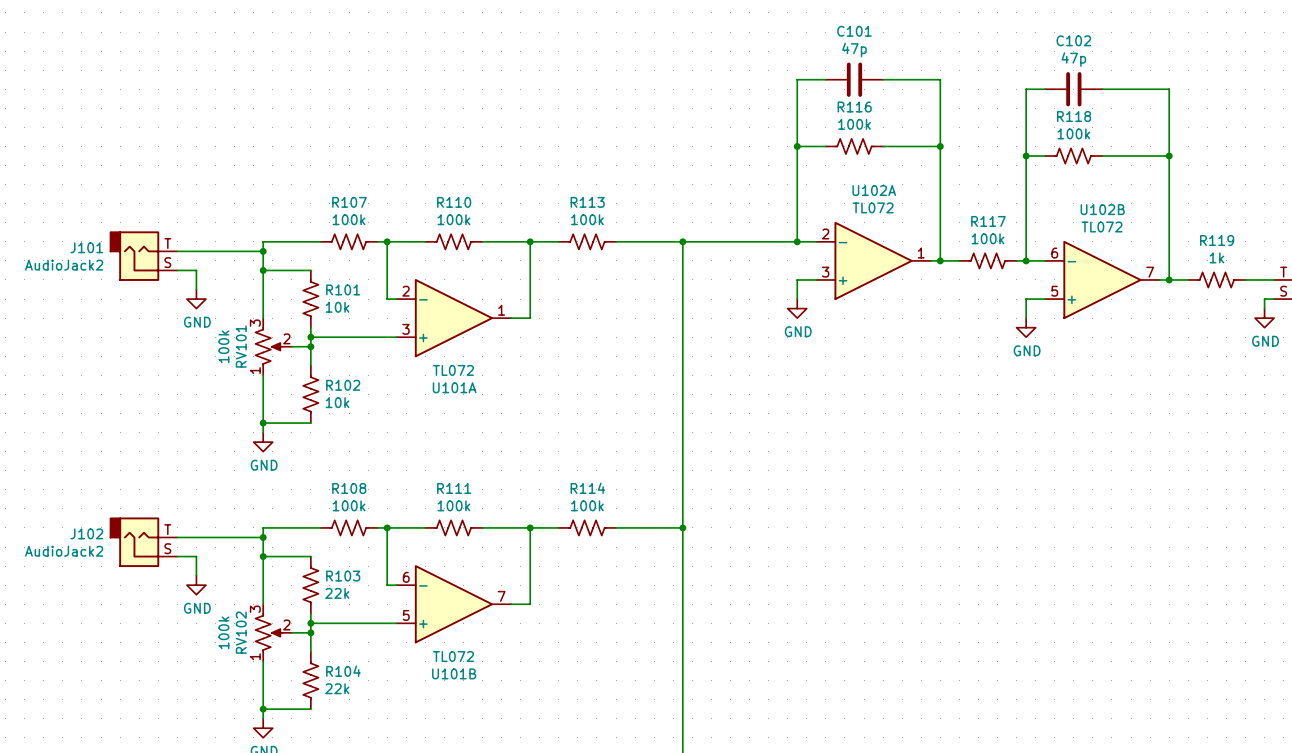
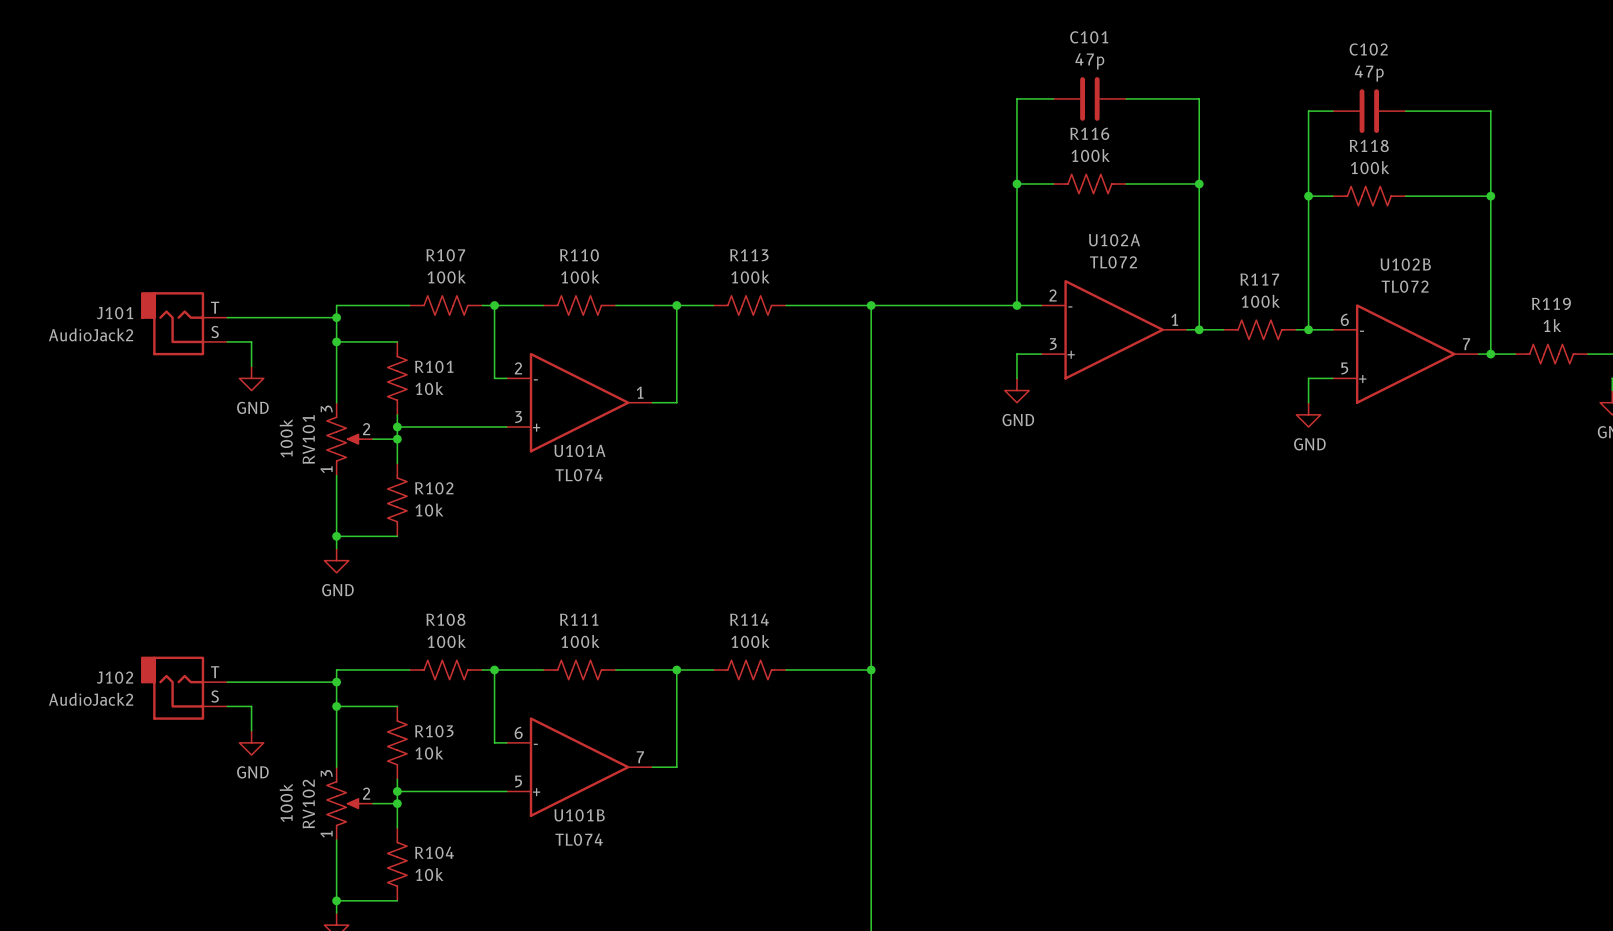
U101A value: TL072 (453, 370) -> TL074 (579, 475)
U101A name position: U101A (454, 387) -> U101A (579, 450)
R103 value: 22k (337, 593) -> 10k (429, 753)
U101B value: TL072 (453, 656) -> TL074 (579, 839)
U101B name position: U101B (454, 673) -> U101B (579, 815)
R104 value: 22k (337, 688) -> 10k (429, 874)

